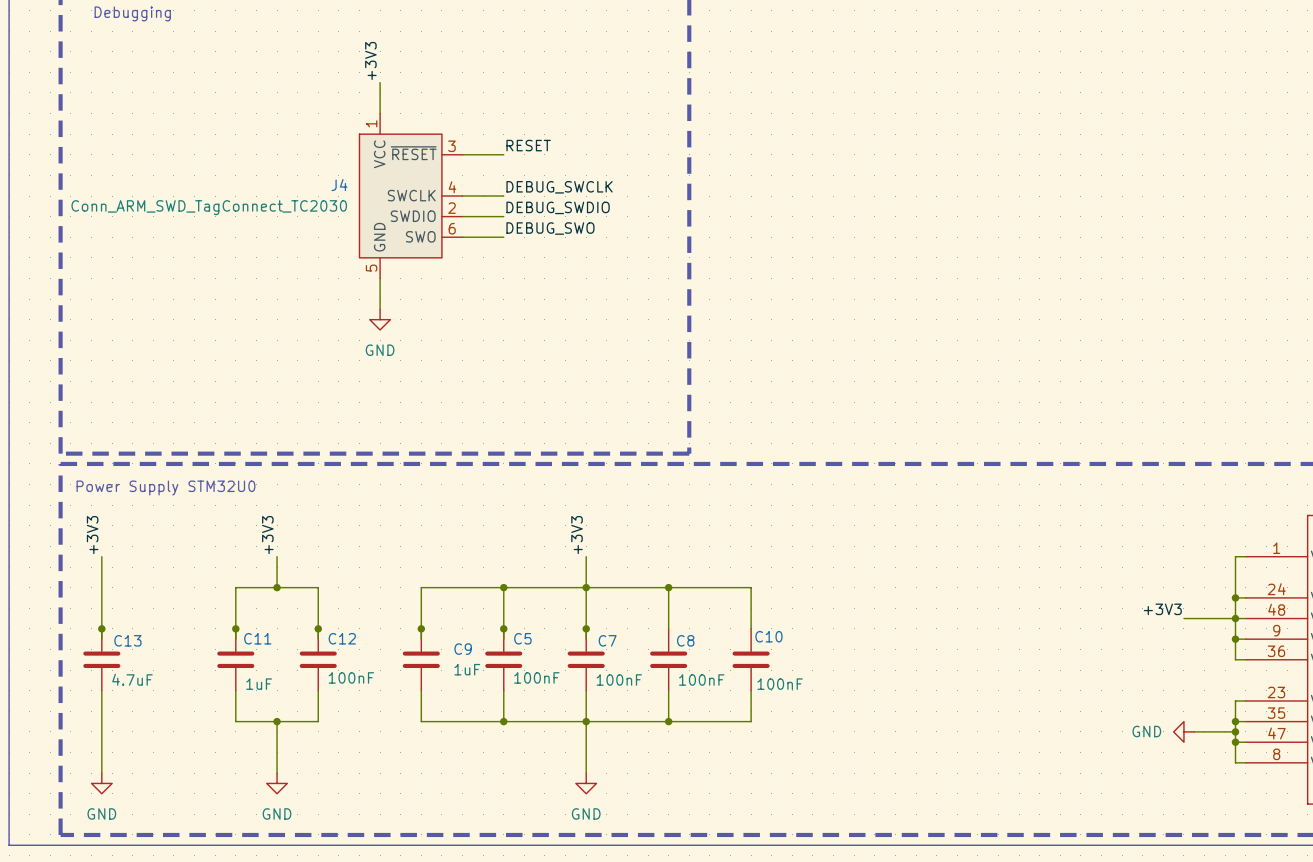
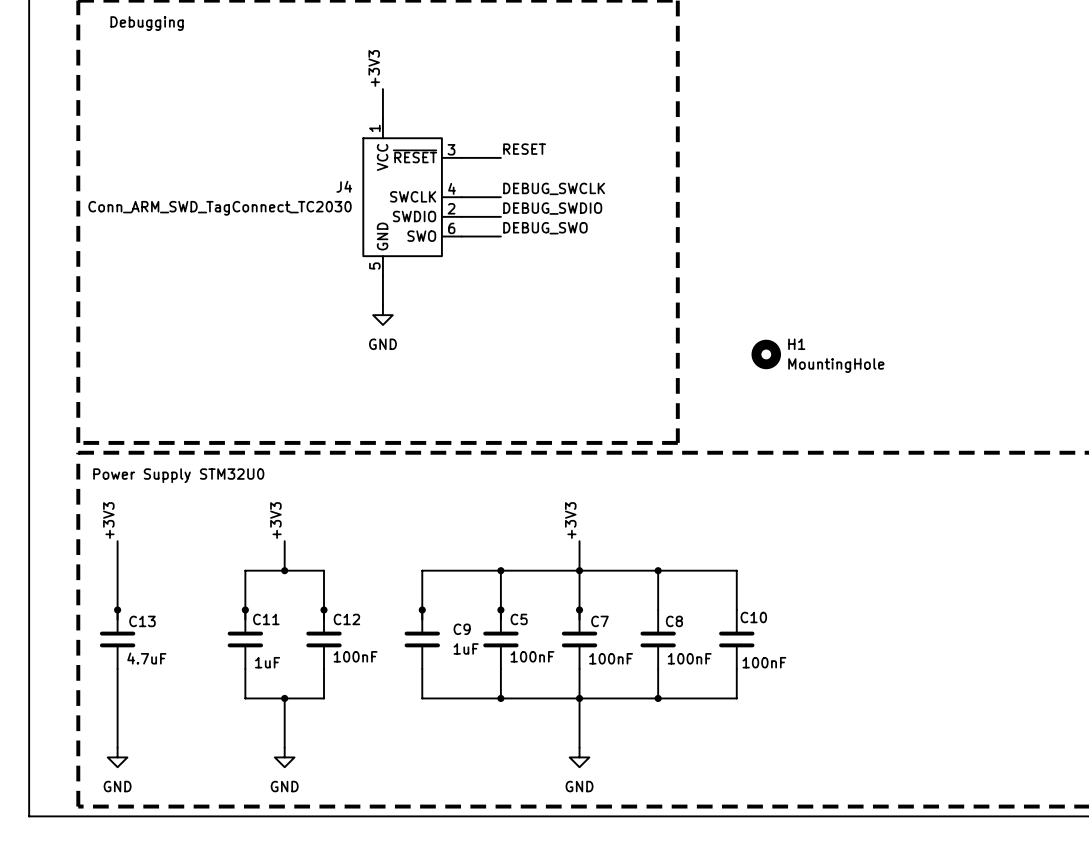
H1: none -> MountingHole (766, 354)

